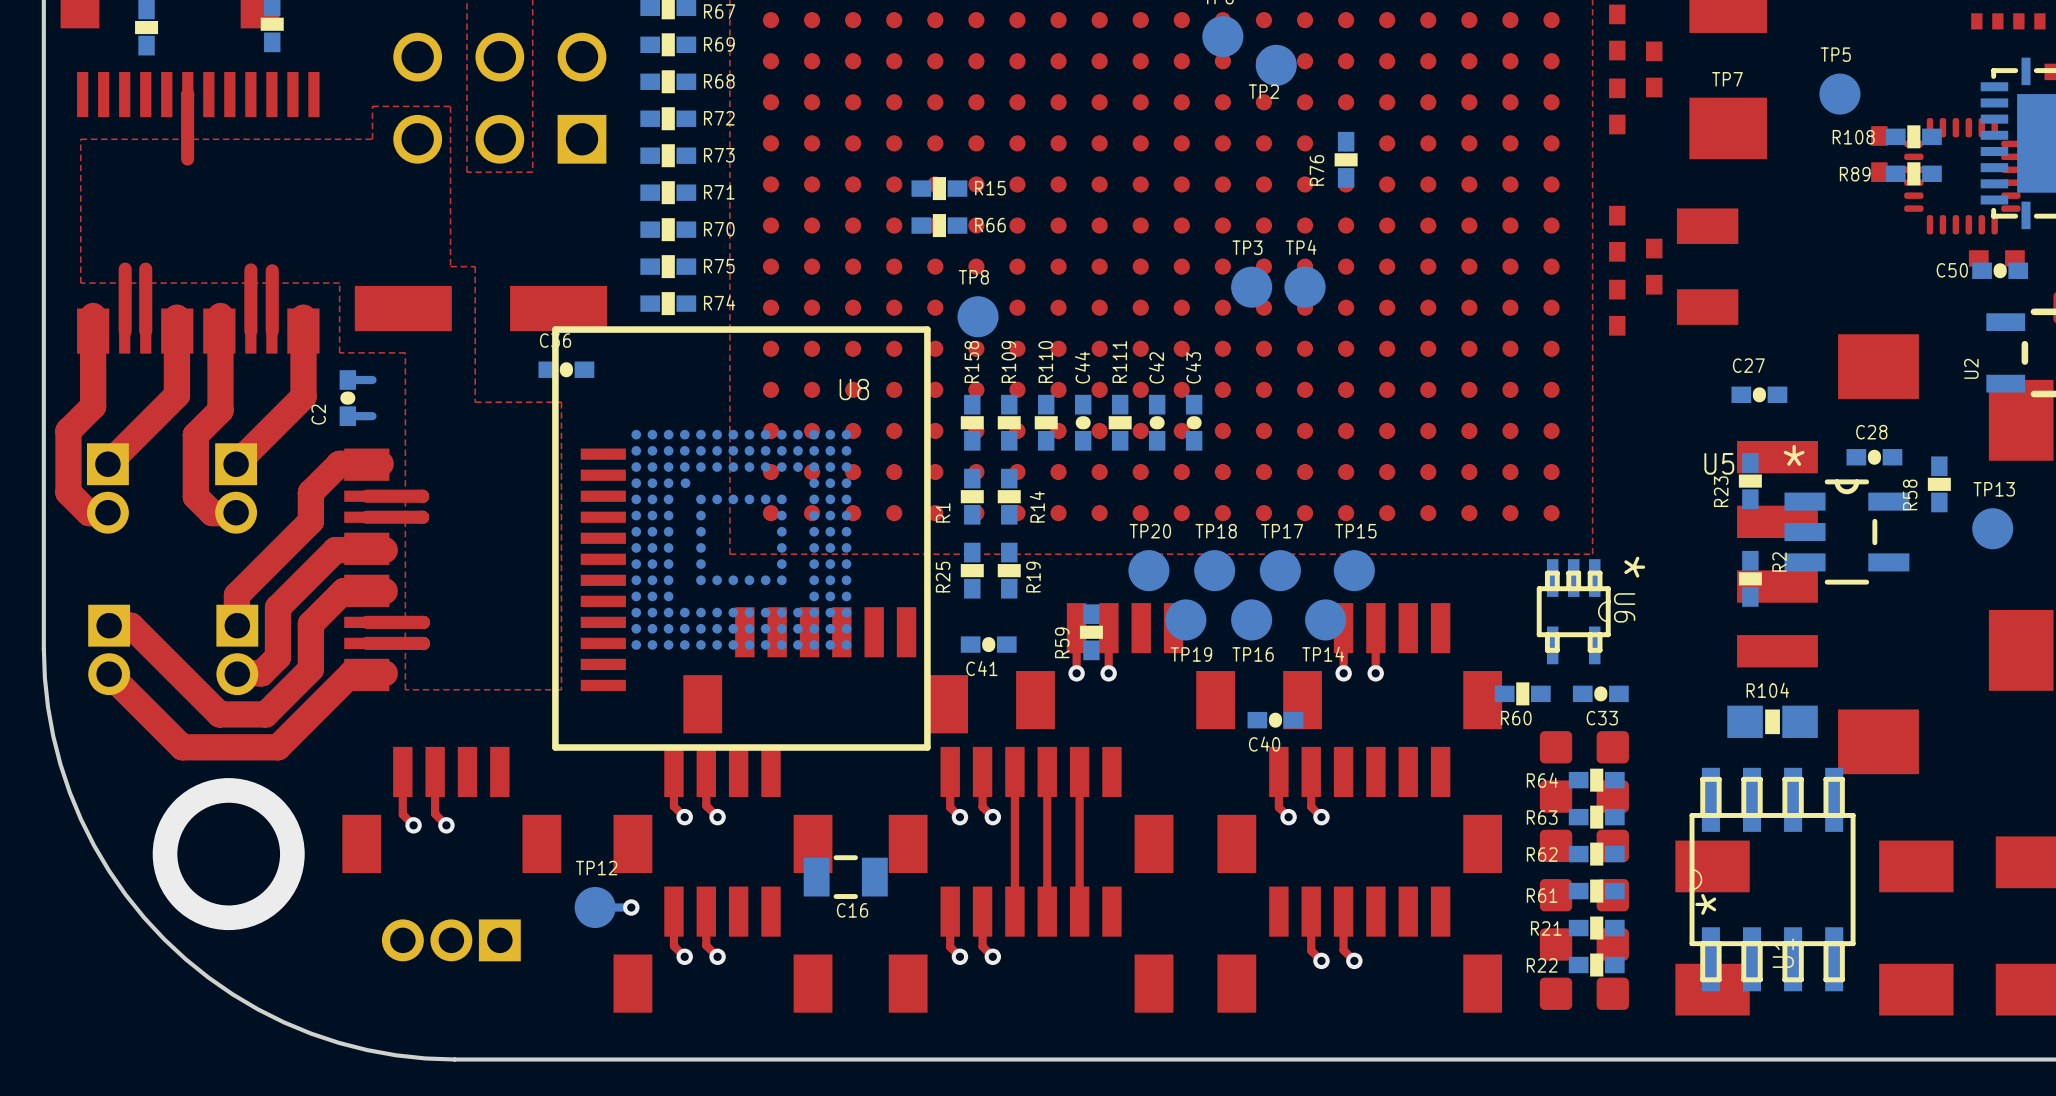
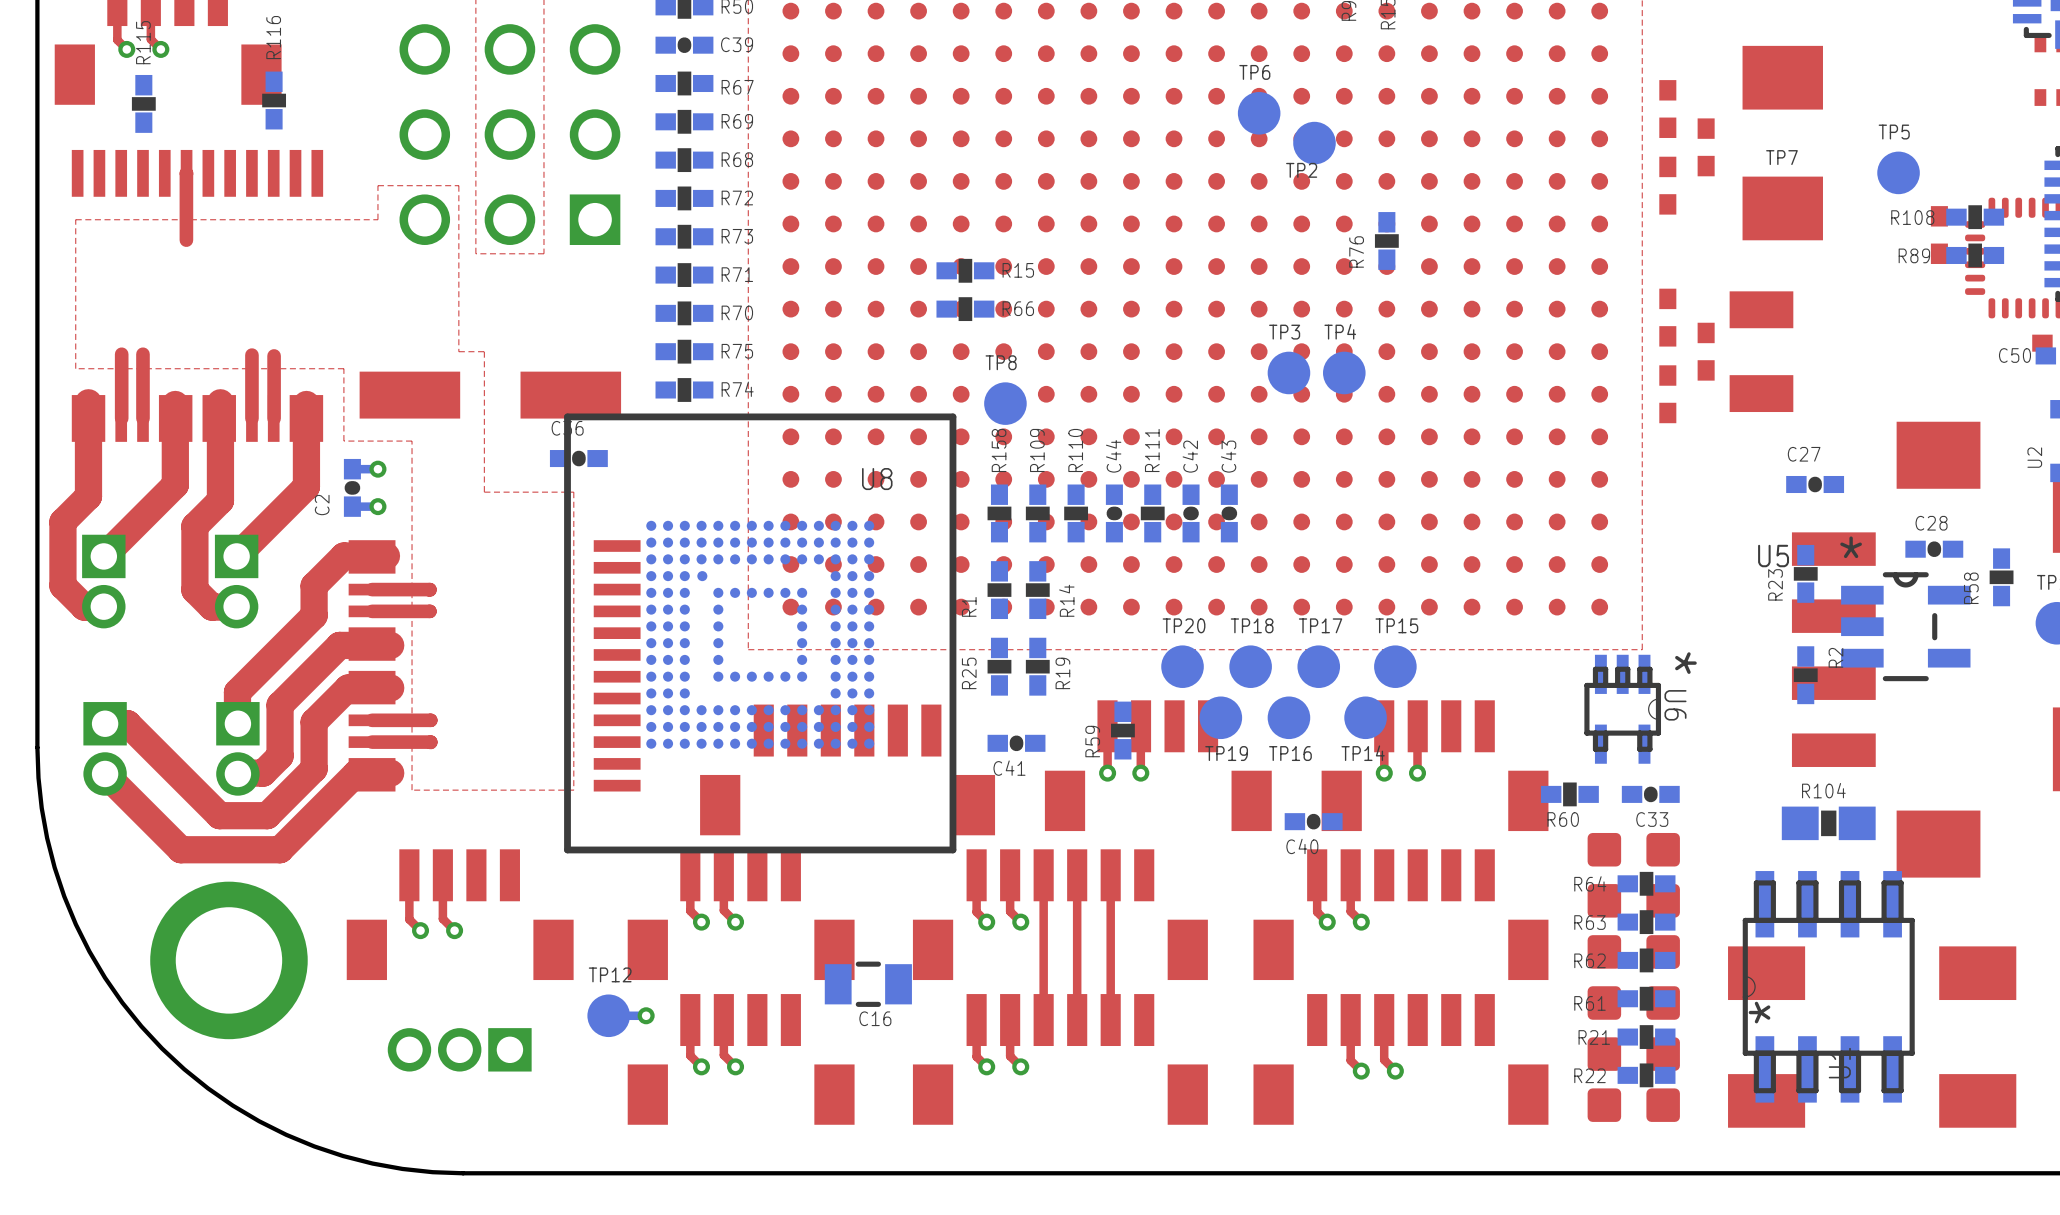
via: none -> (377, 469)
via: none -> (377, 506)

